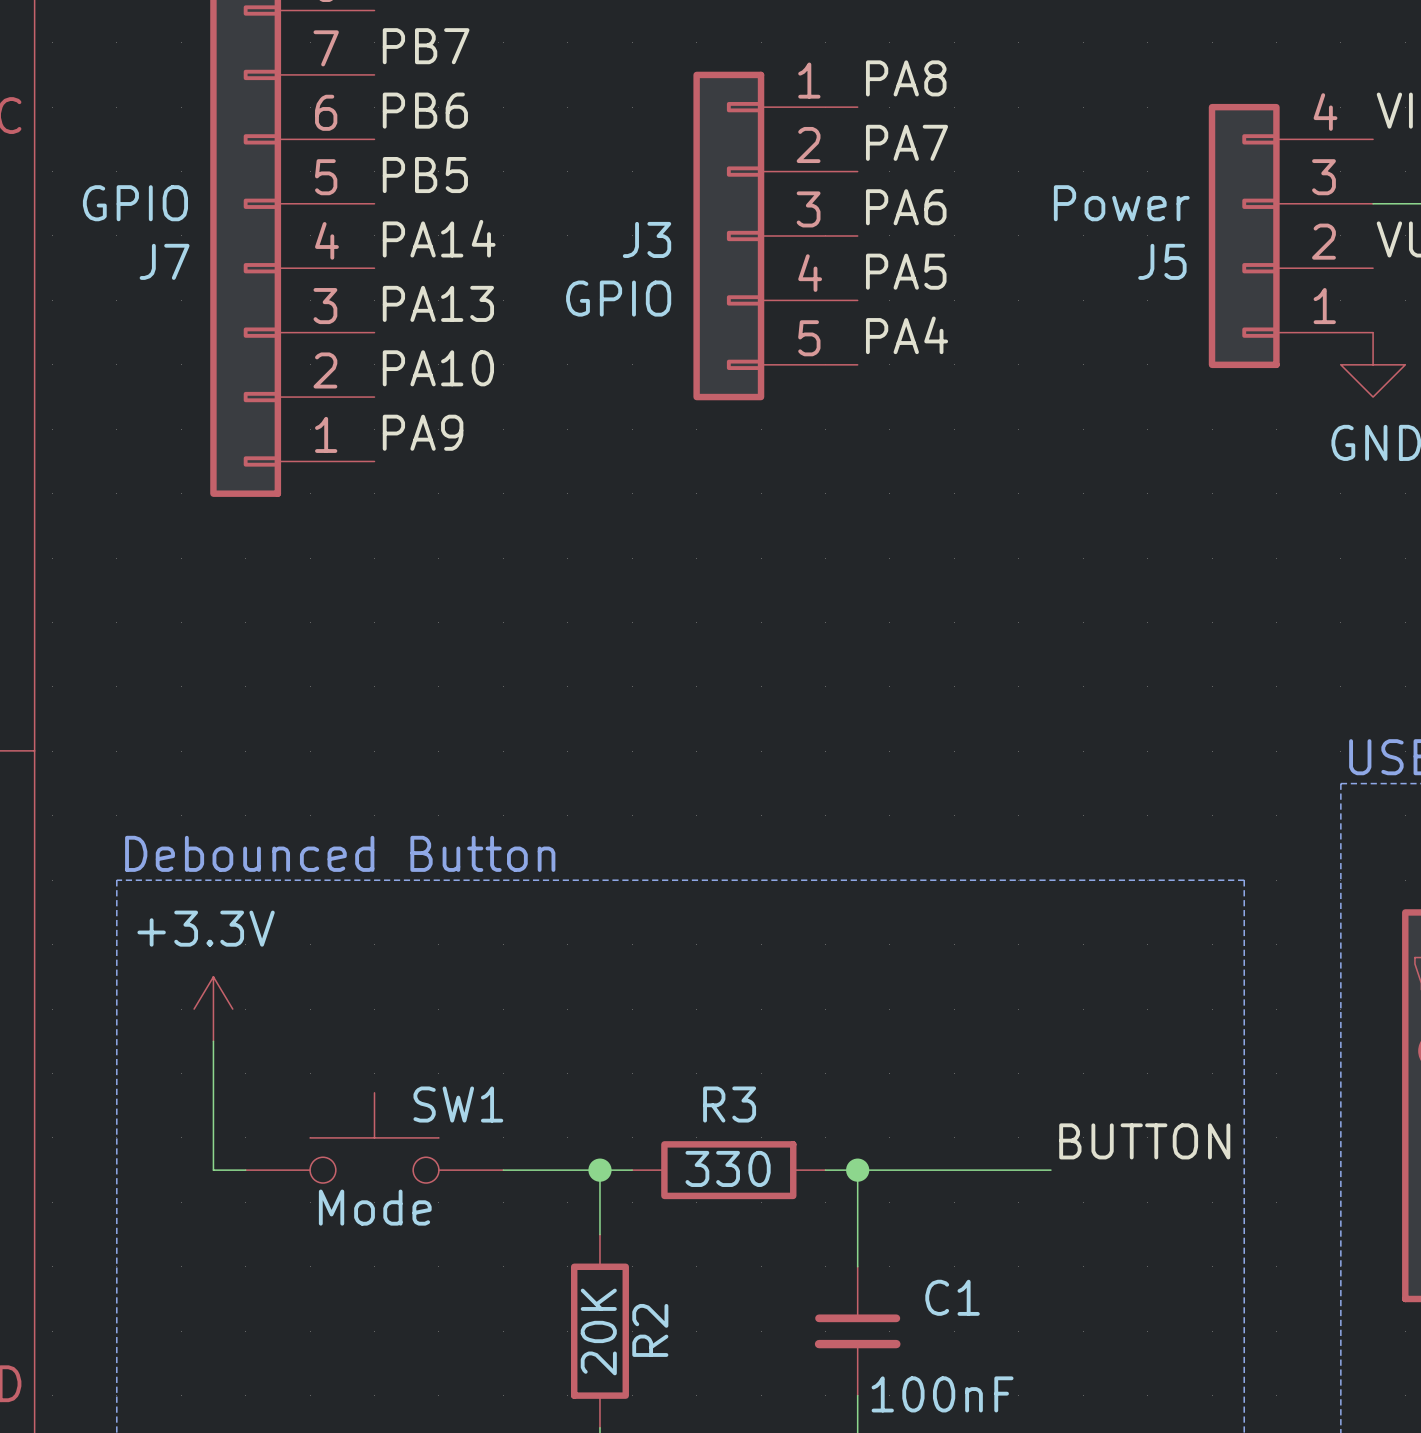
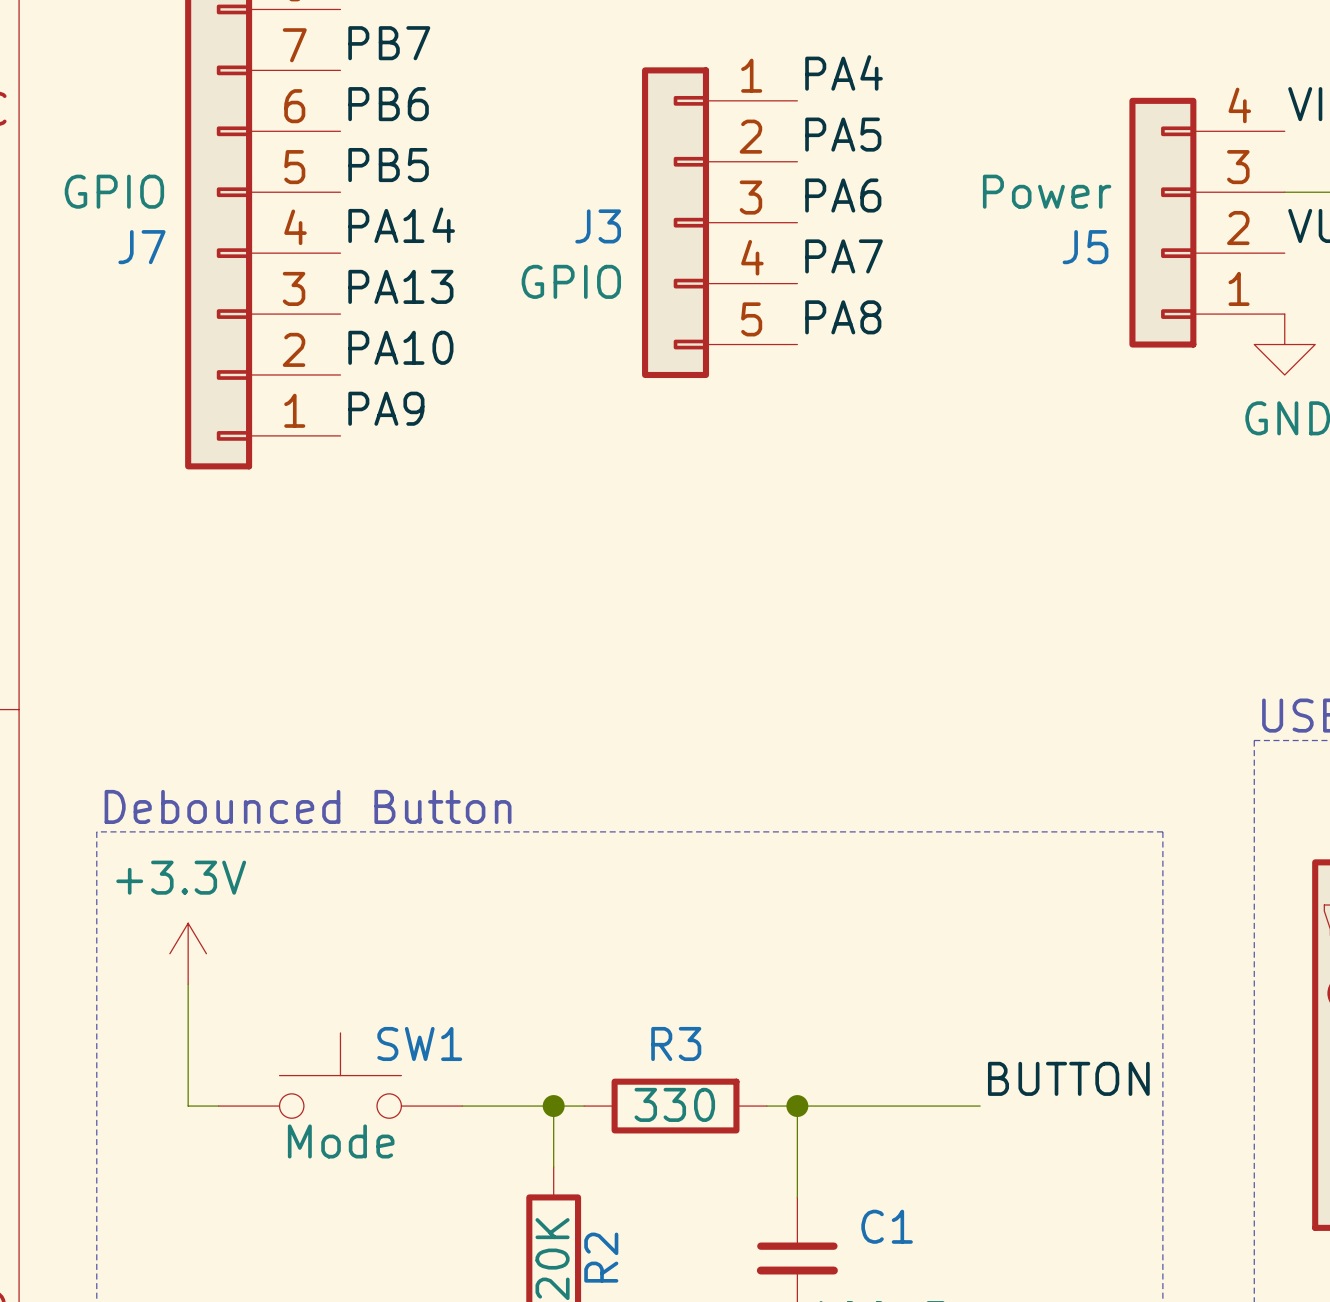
label: PA8 (906, 78) -> PA4 (844, 72)
label: PA7 (907, 142) -> PA5 (843, 134)
label: PA5 (906, 271) -> PA7 (844, 256)
label: PA4 (907, 335) -> PA8 (843, 317)

